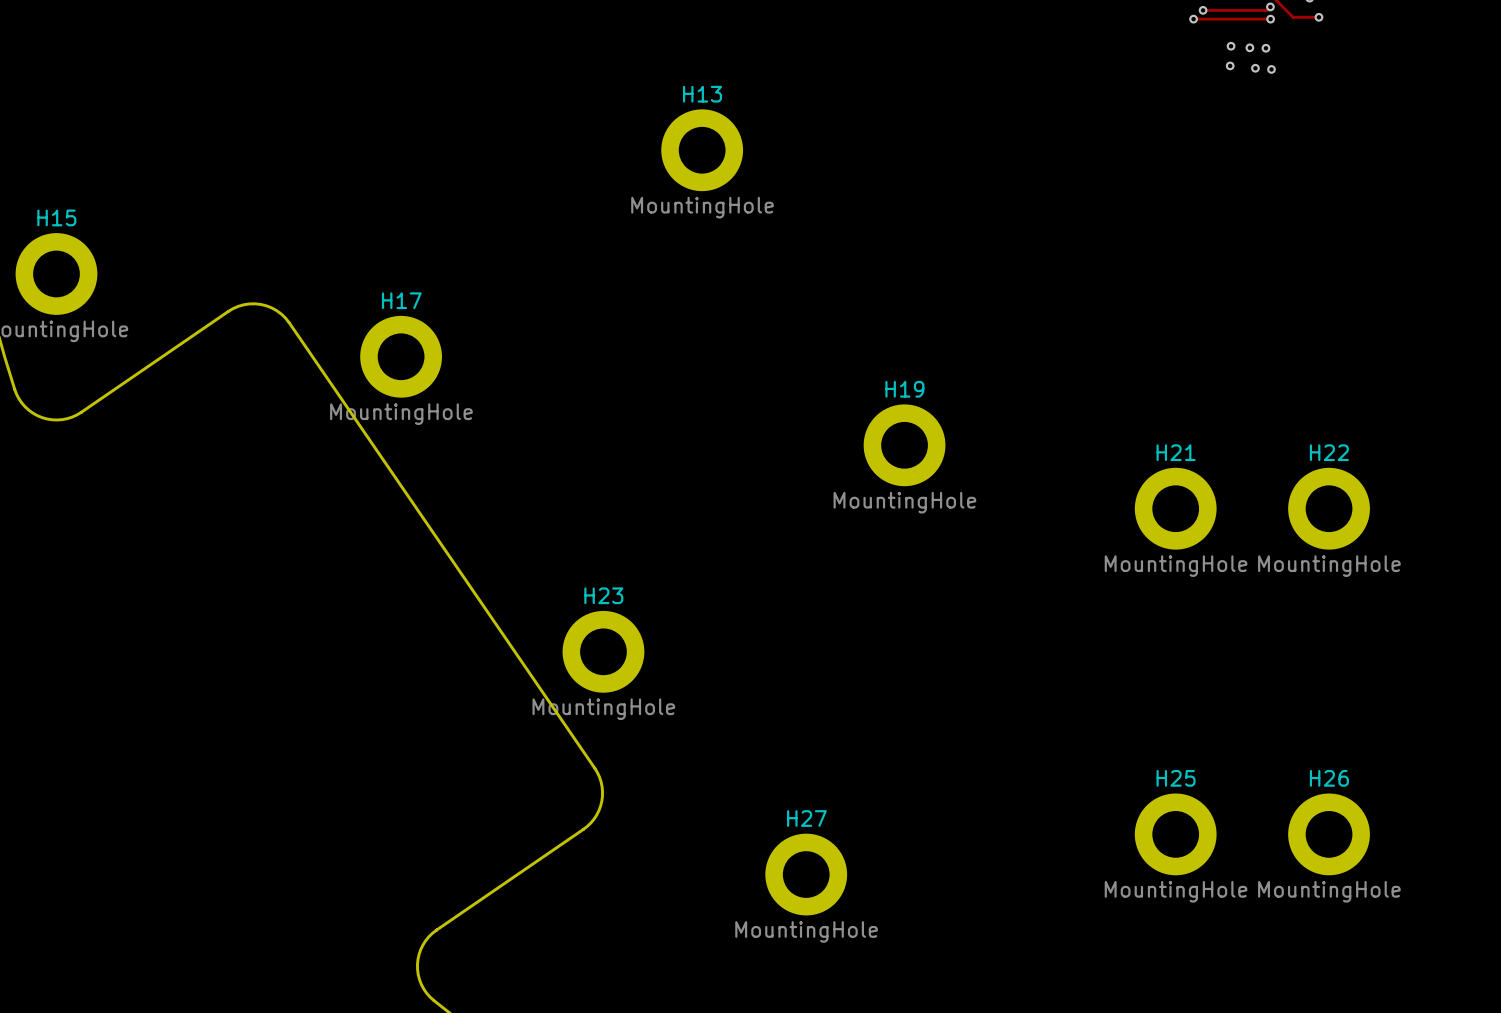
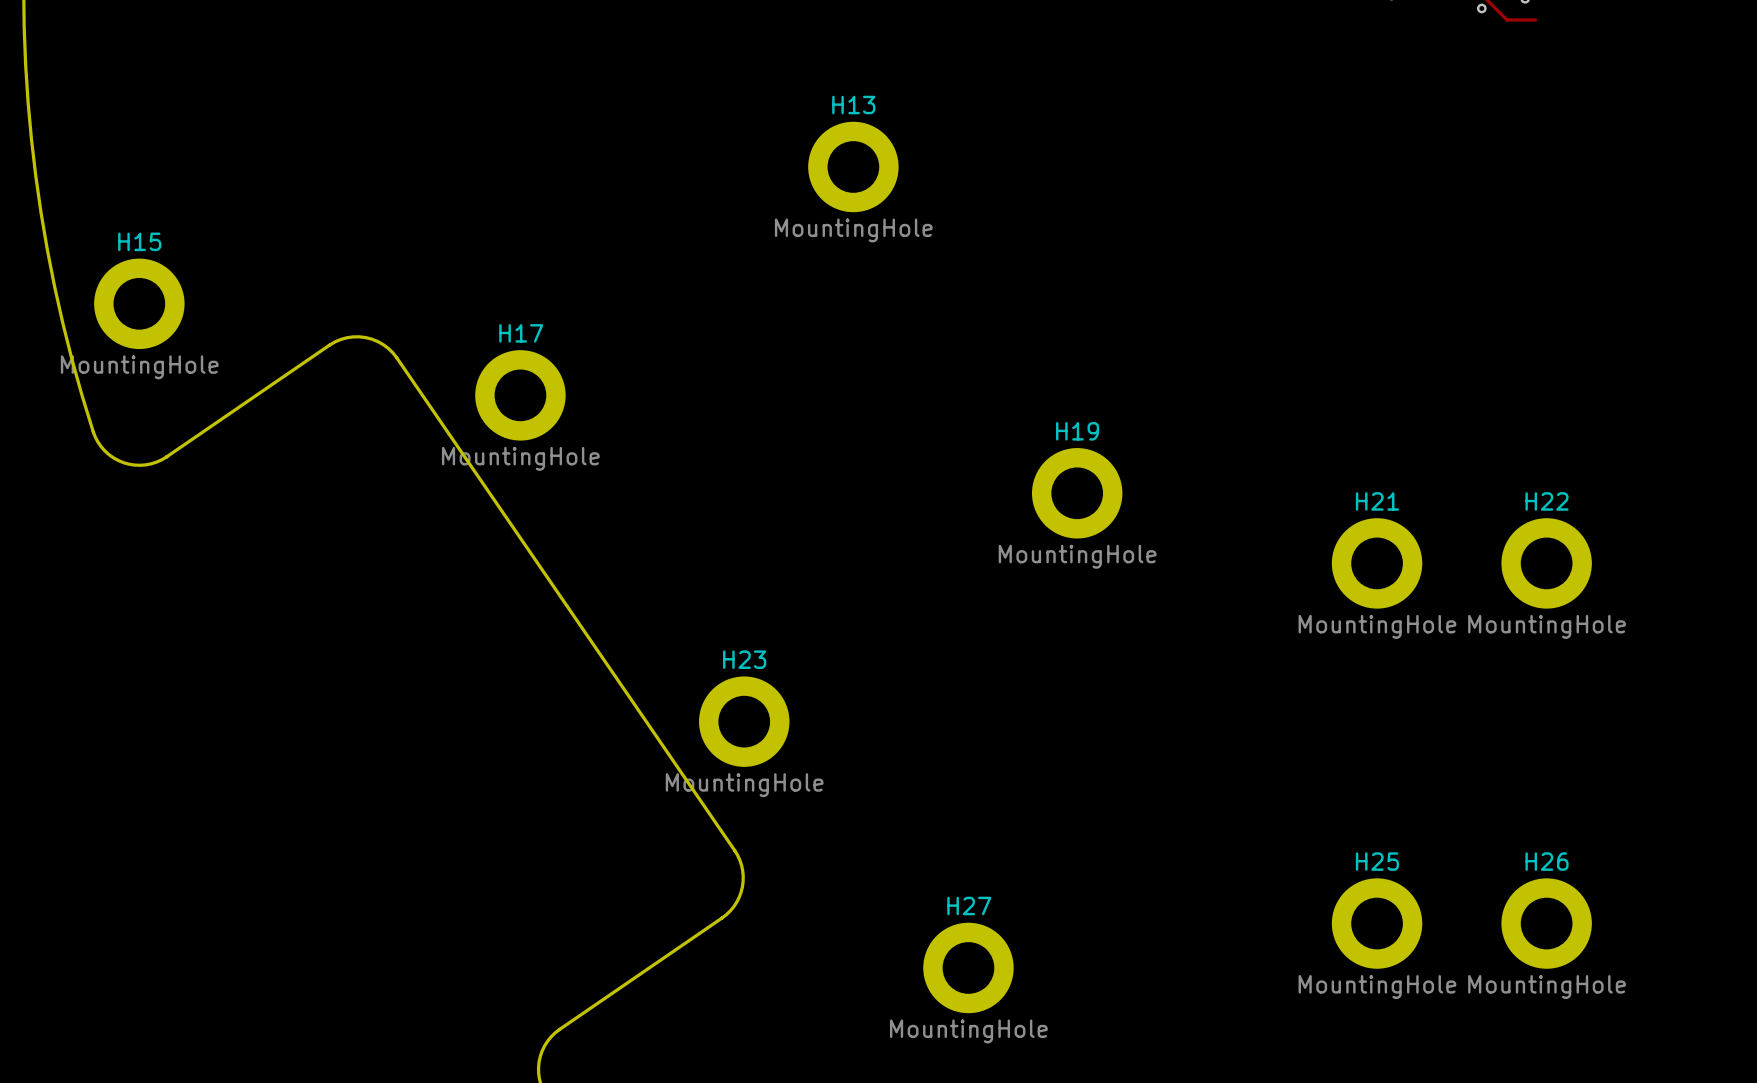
track: (1270, 6) (1266, 10) (1203, 10) -> none
via: (1203, 10) -> none
via: (1318, 17) -> none
track: (1193, 19) (1270, 19) -> none
via: (1193, 19) -> none
via: (1270, 19) -> none
via: (1231, 46) -> none
via: (1249, 47) -> none
via: (1265, 48) -> none
via: (1230, 65) -> none
via: (1255, 68) -> none
via: (1271, 69) -> none

